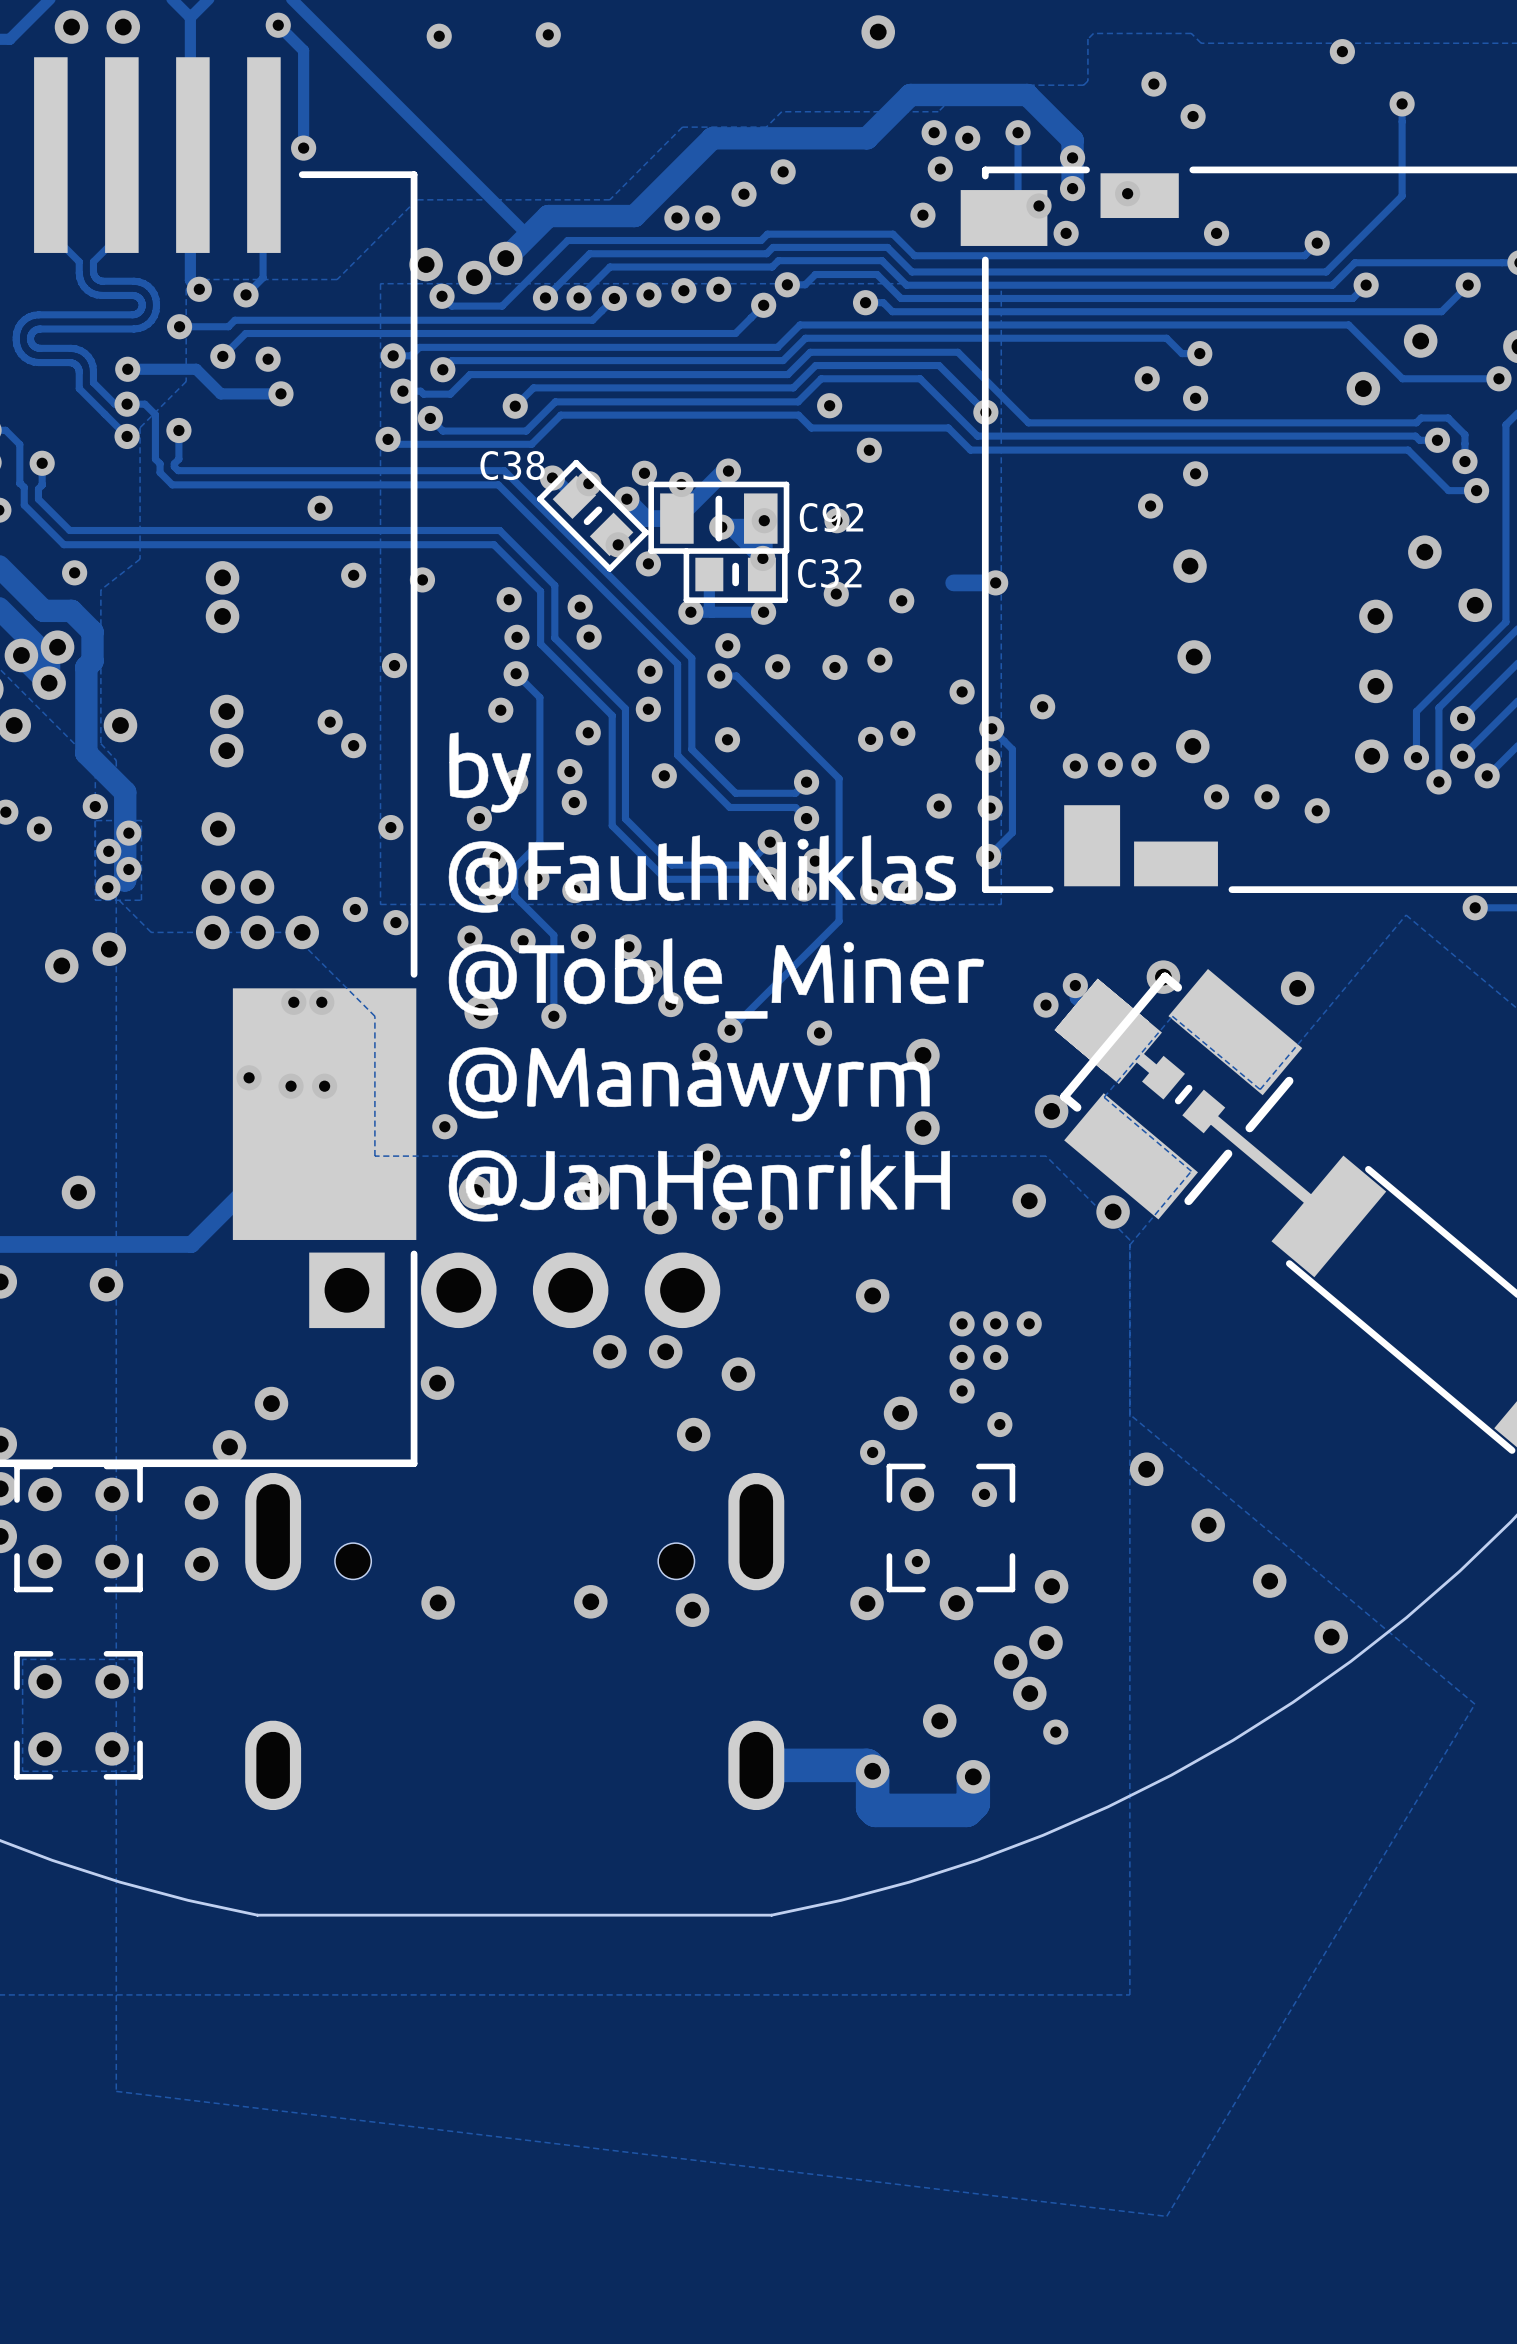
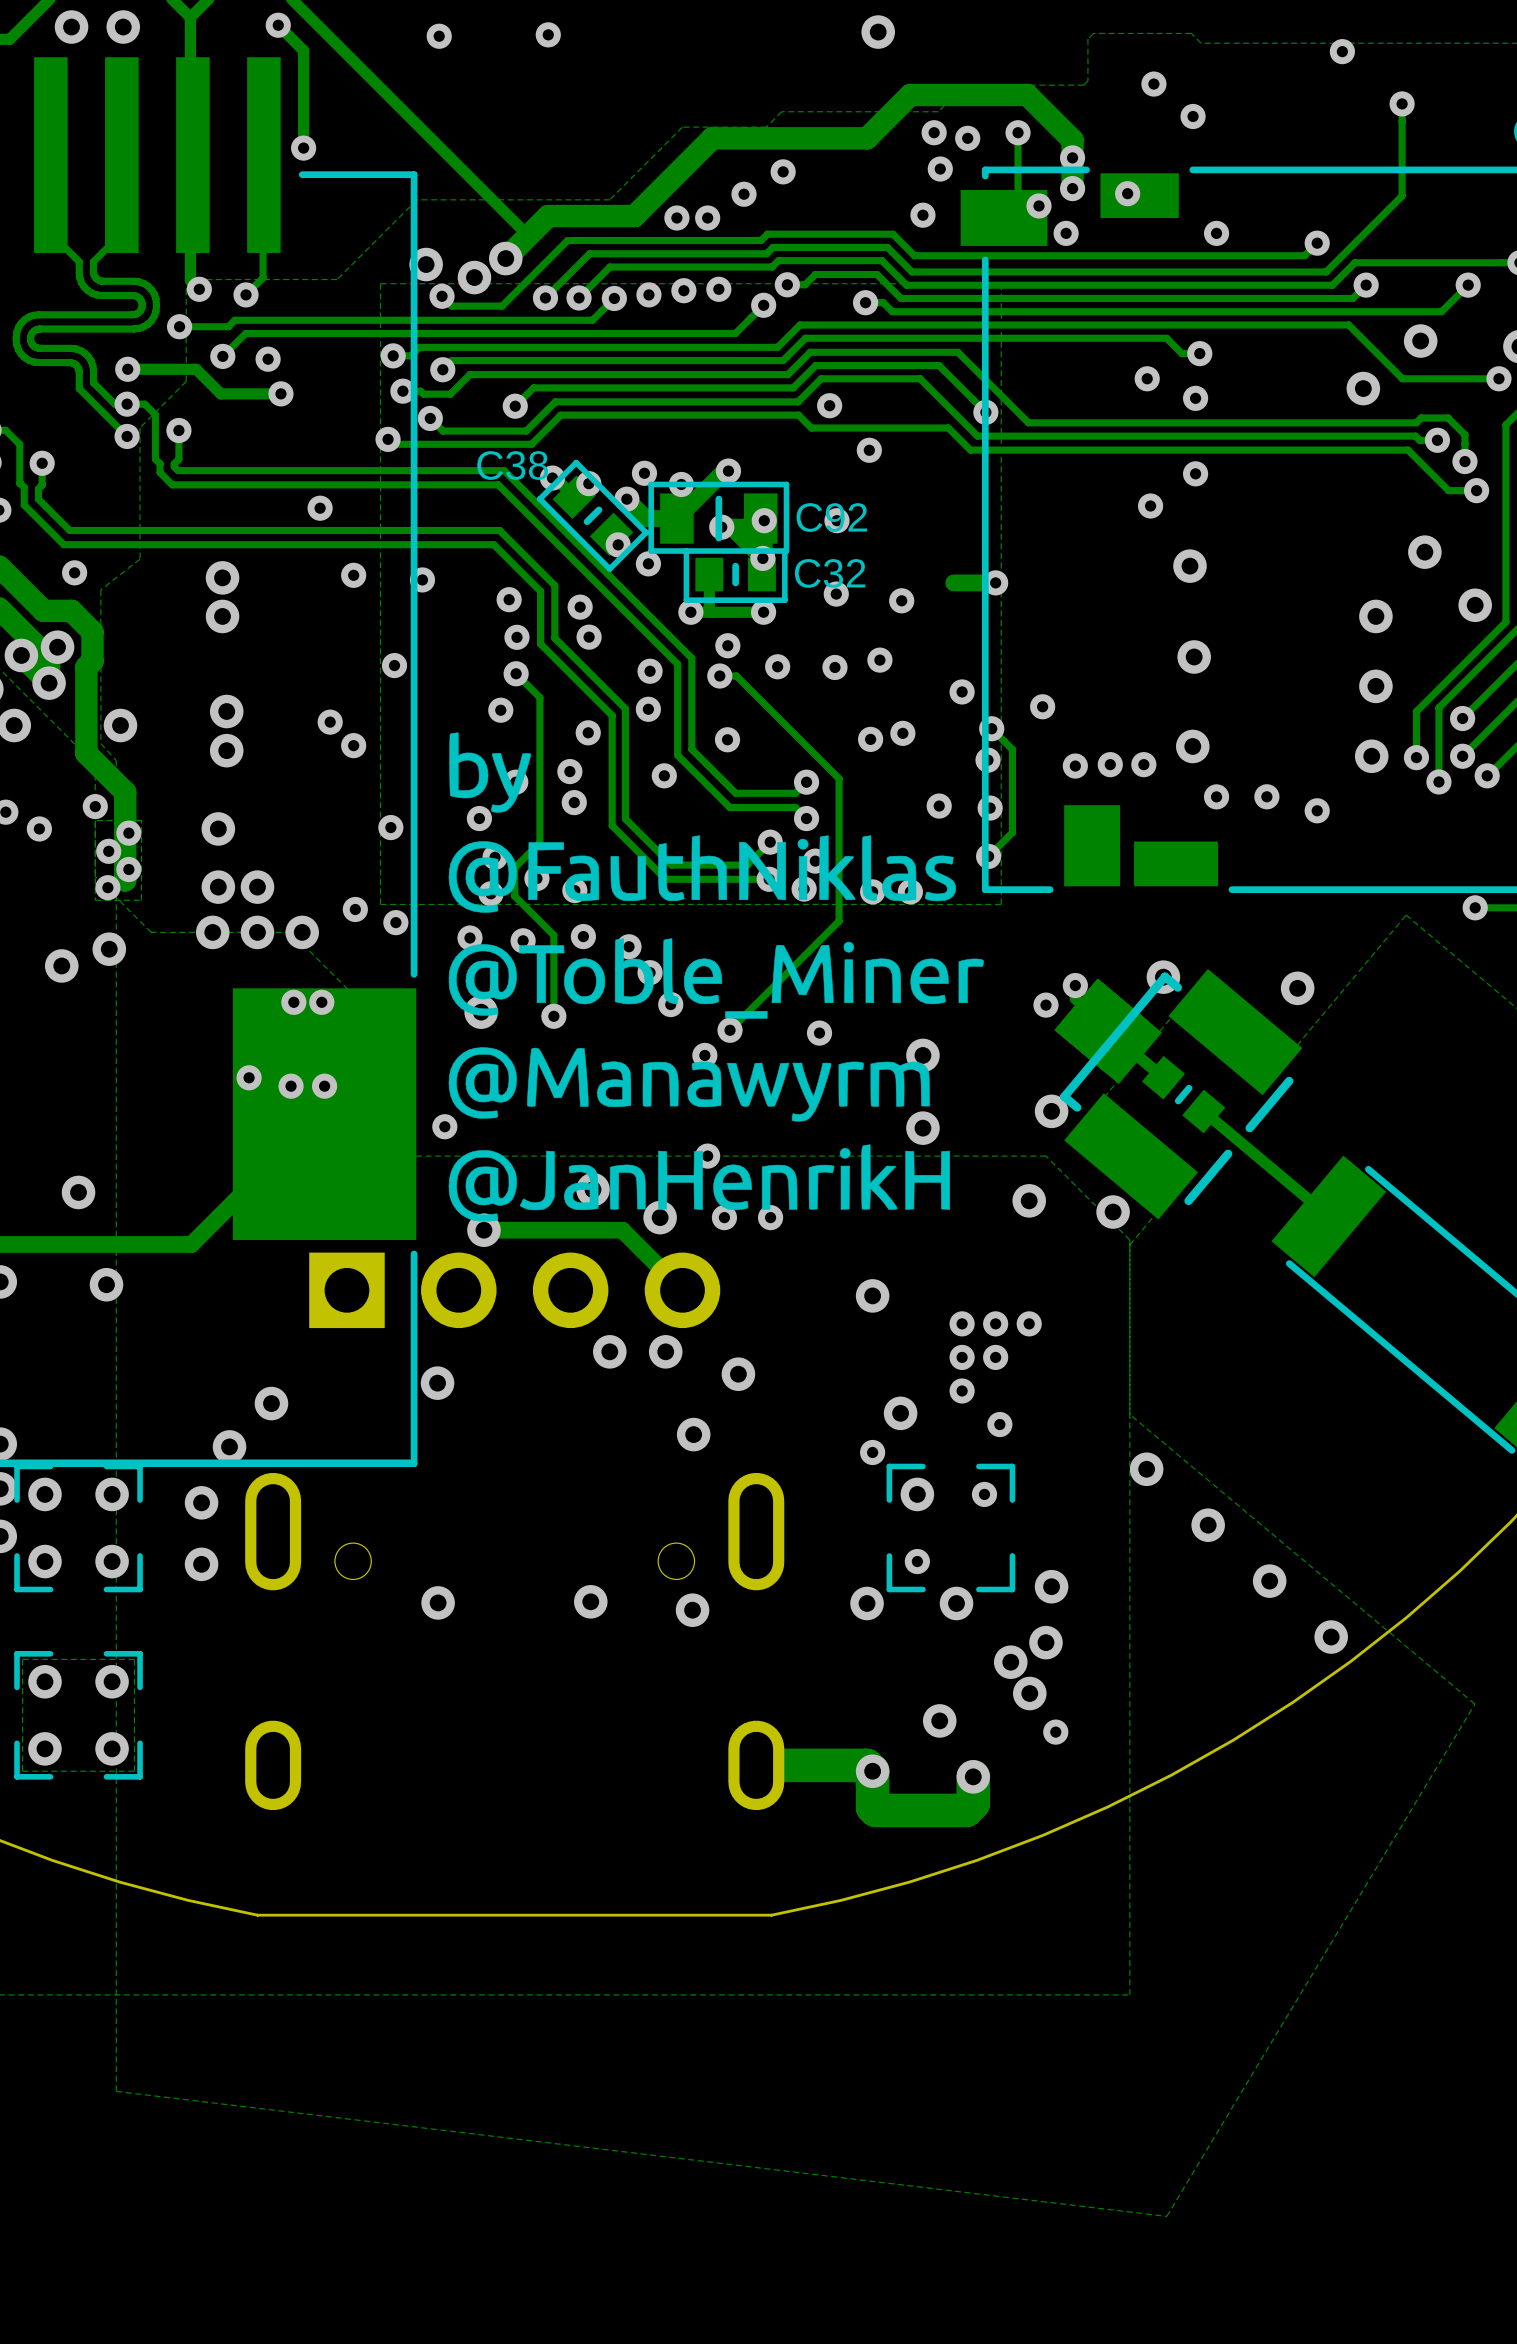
via position: (475, 1192) -> (483, 1230)
track: none -> (483, 1230) (622, 1230) (682, 1290)

